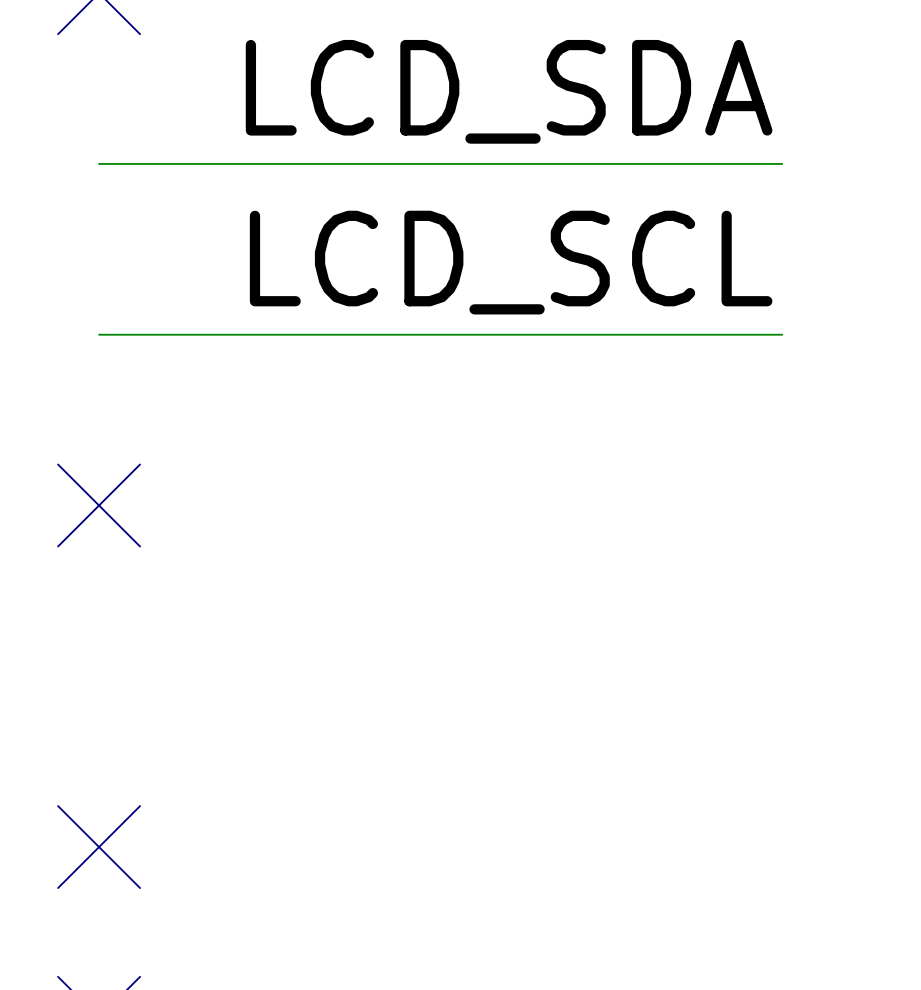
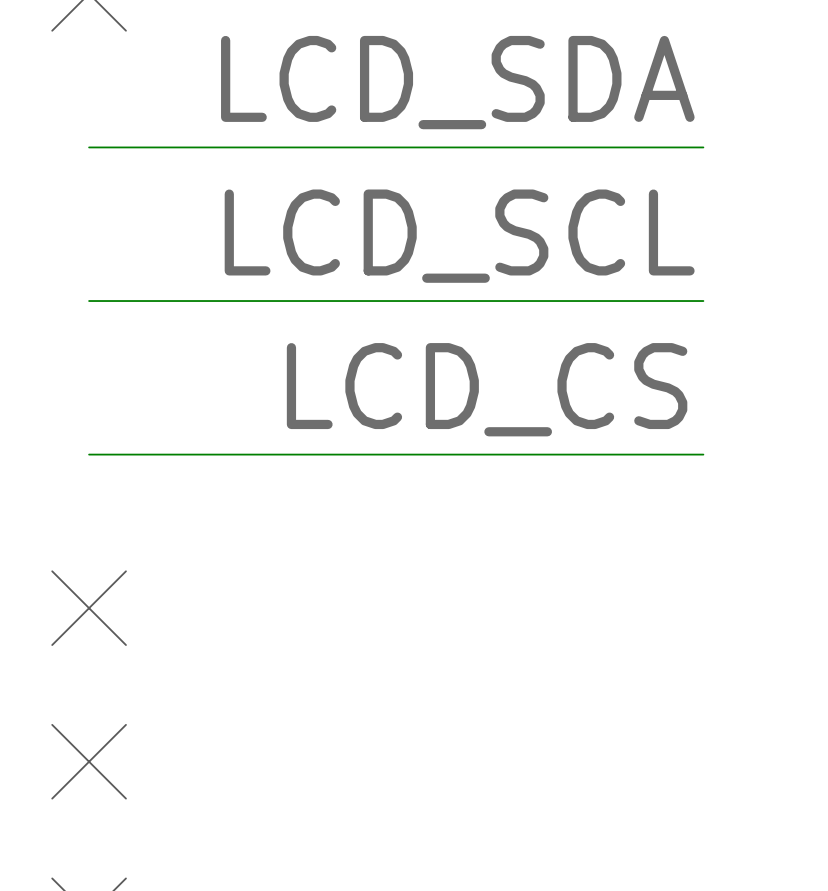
label: none -> LCD_CS (487, 389)
wire: none -> (89, 454) (703, 454)
no-connect mark position: (99, 505) -> (89, 608)

